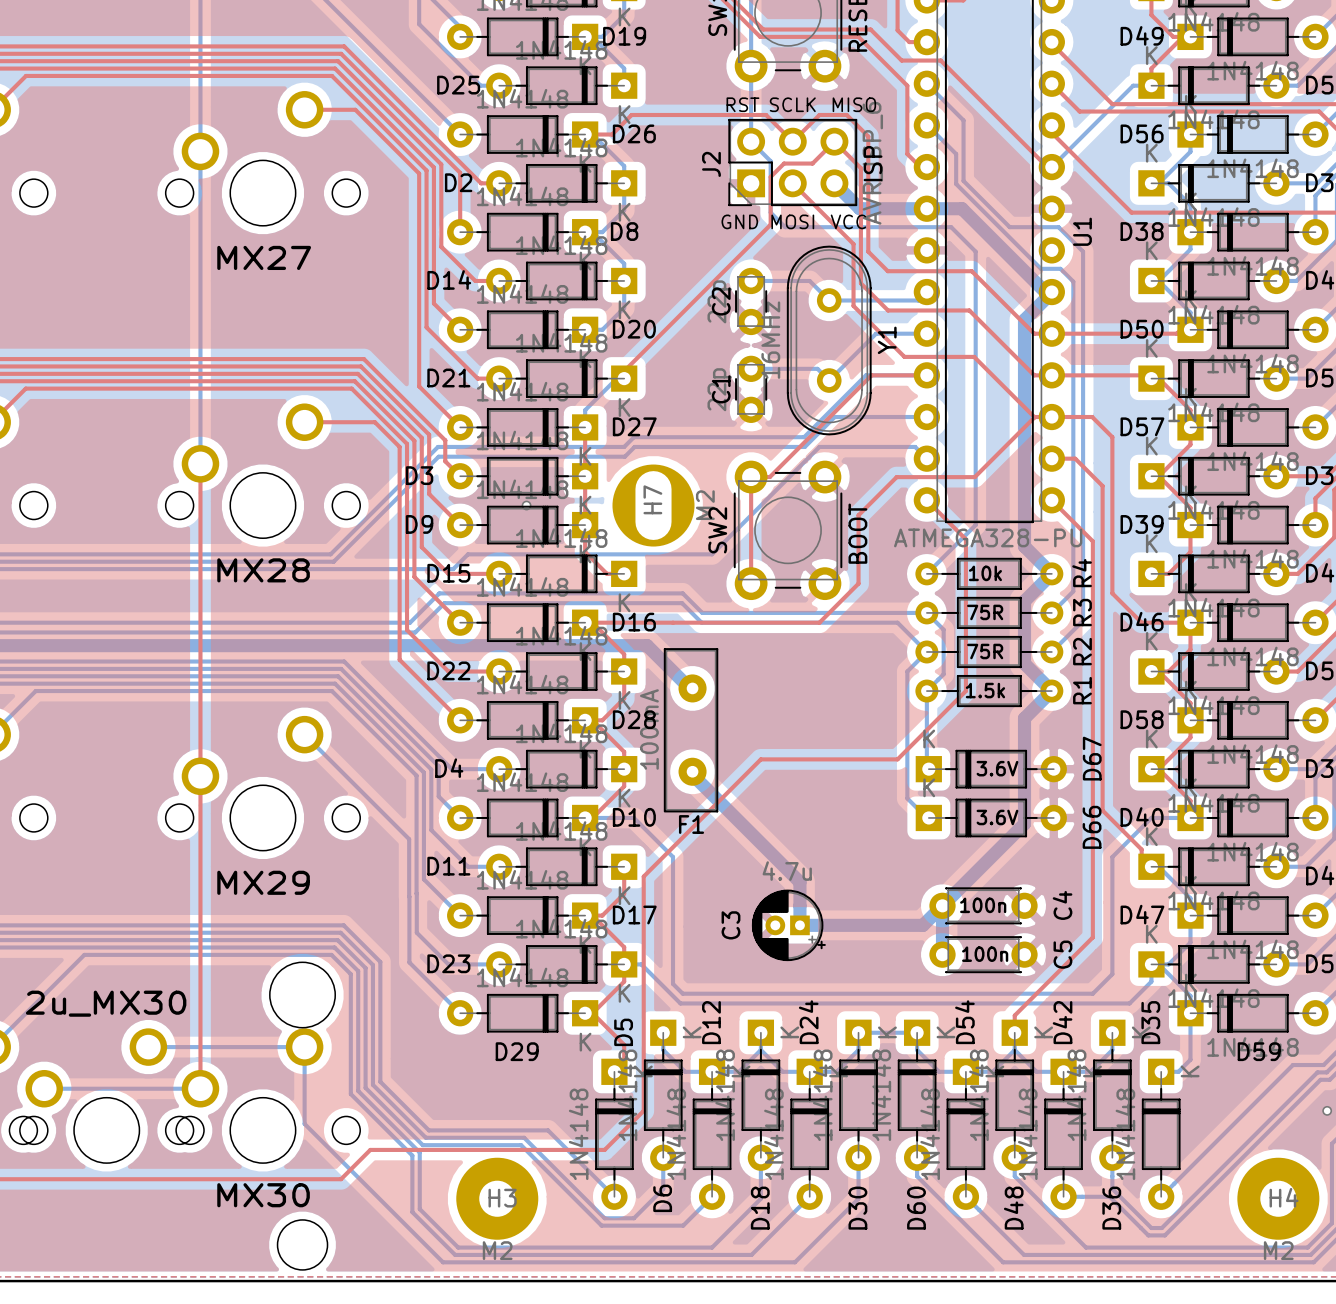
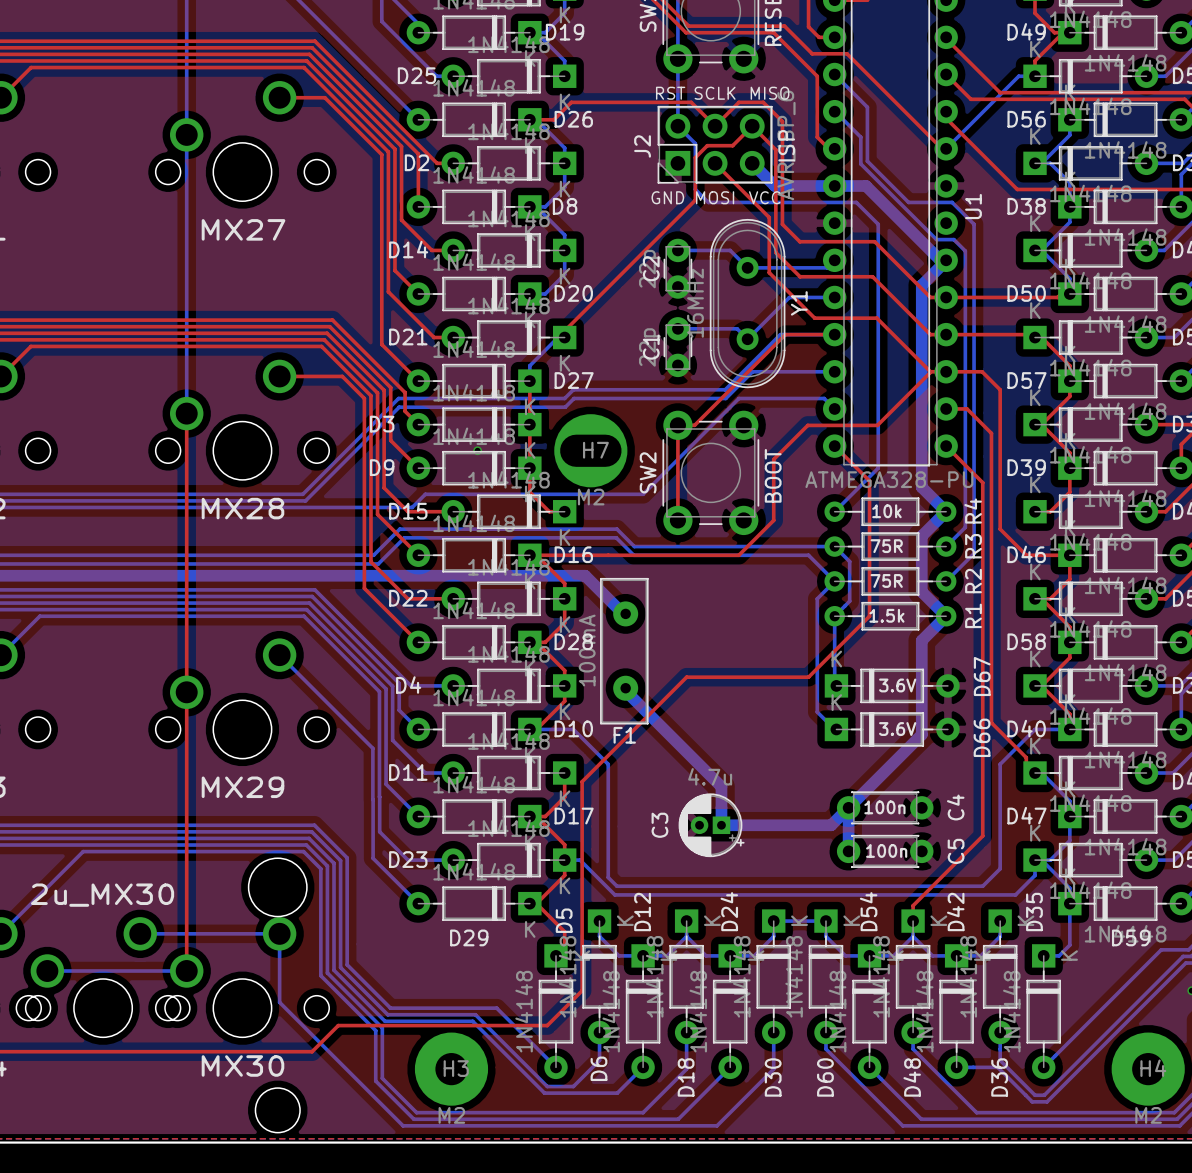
H7 rotation: 0° (653, 505) -> 90° clockwise (590, 450)

